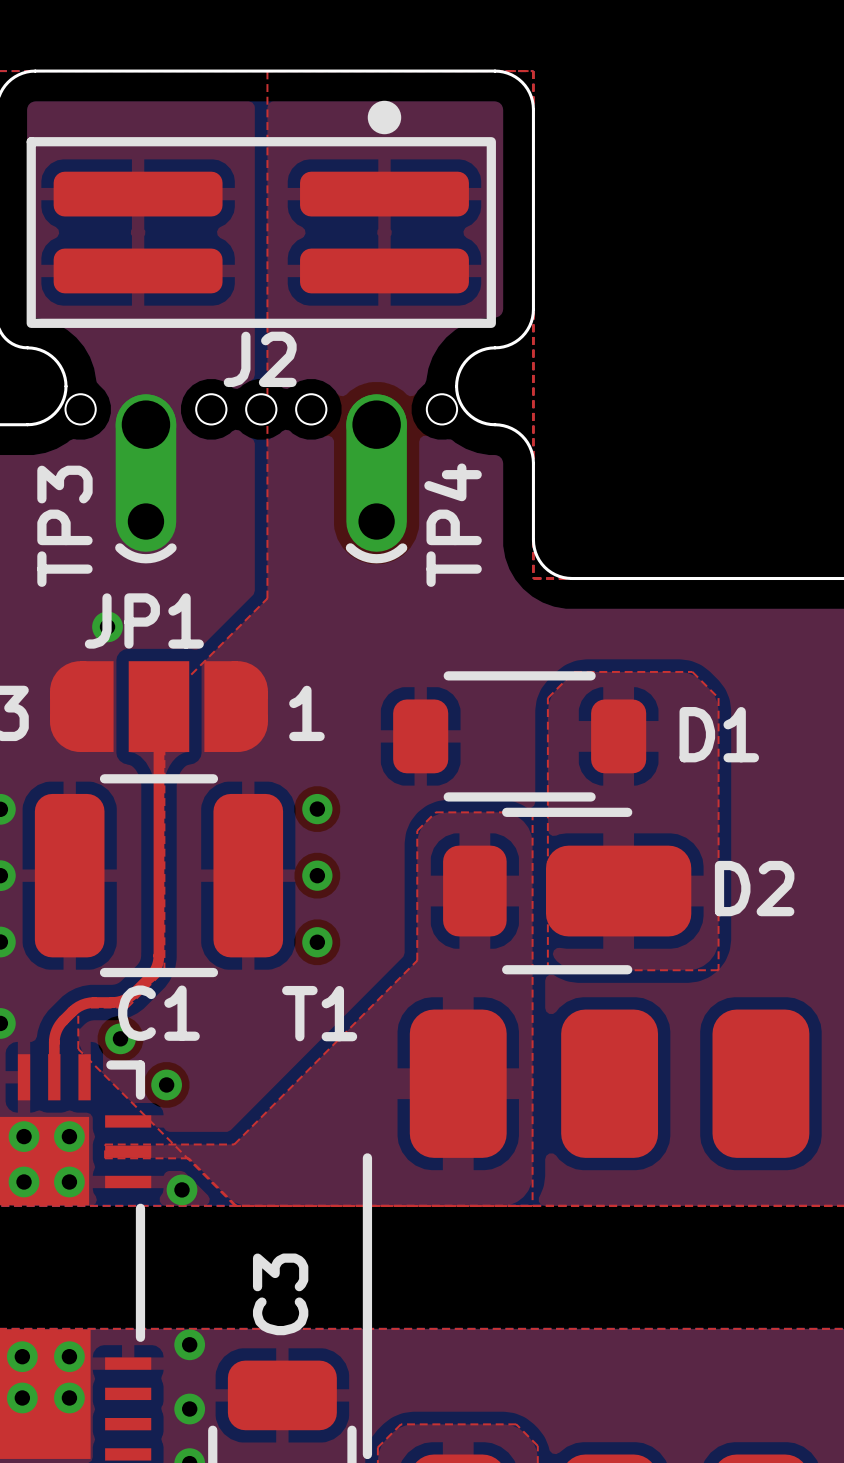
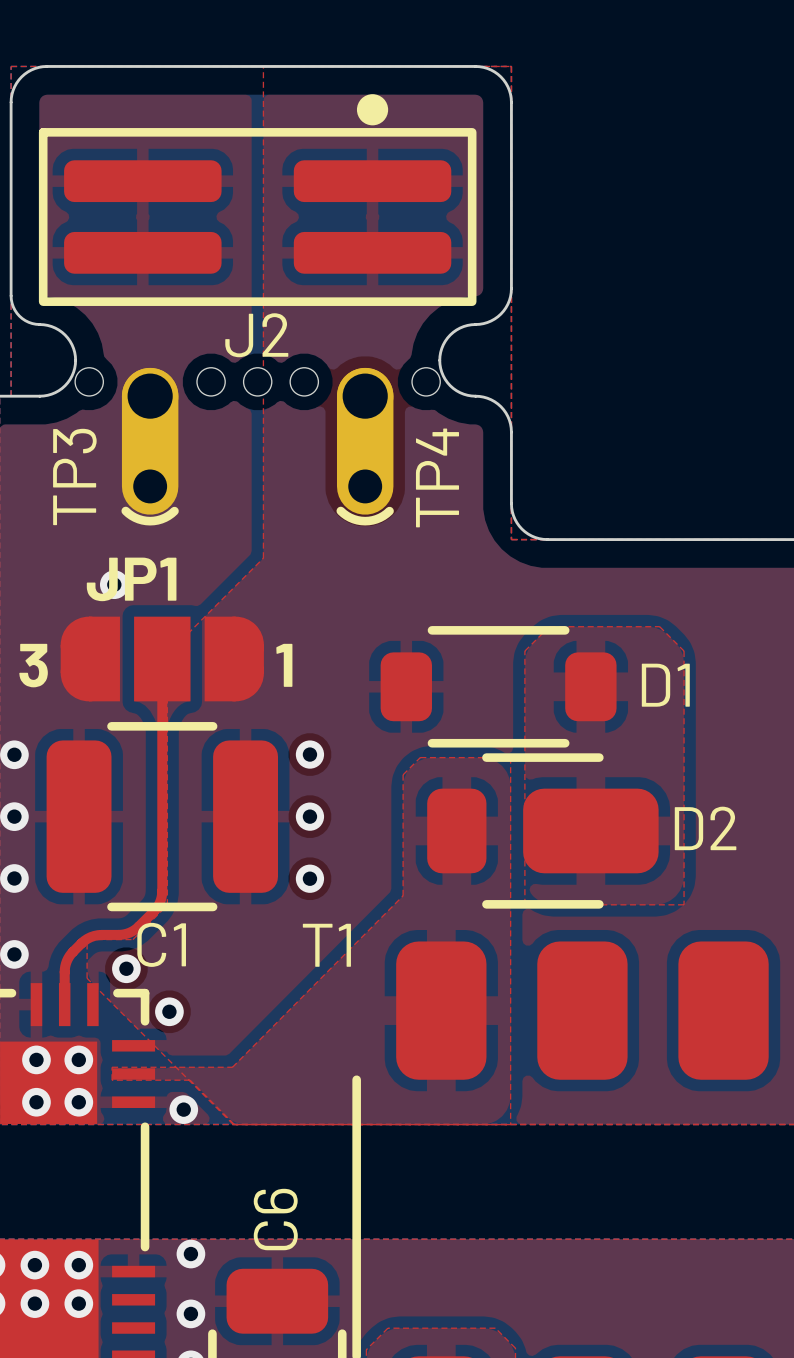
C3 name: C3 (280, 1294) -> C6 (275, 1219)

